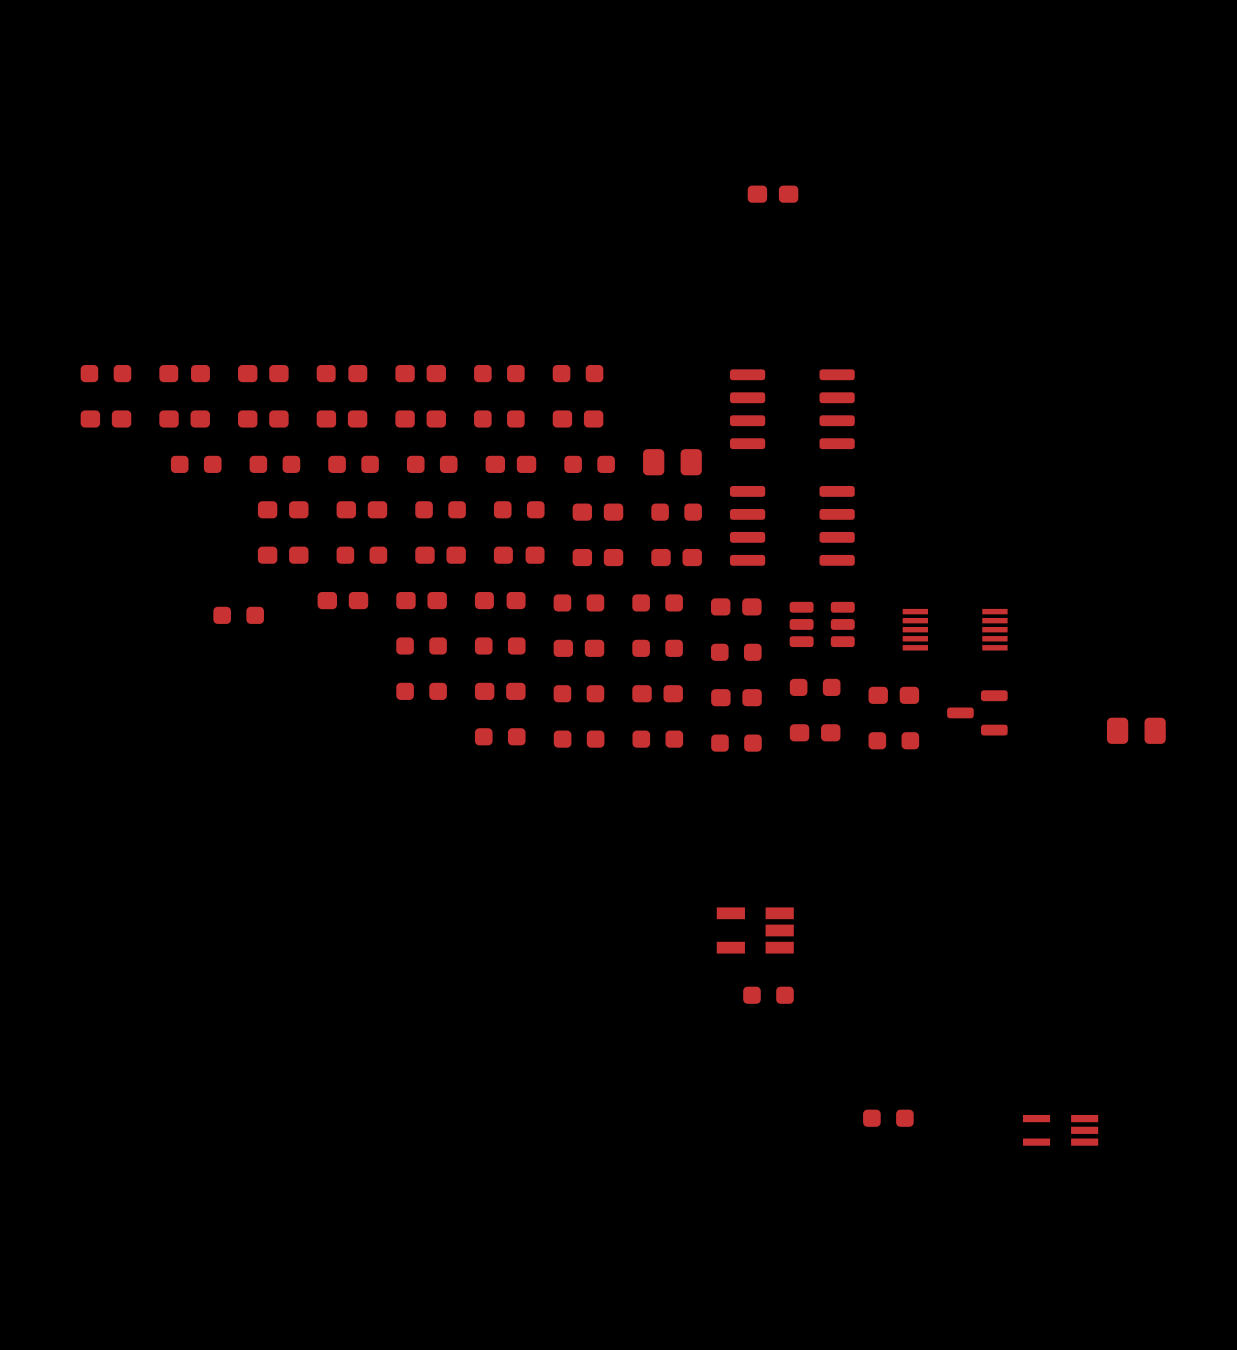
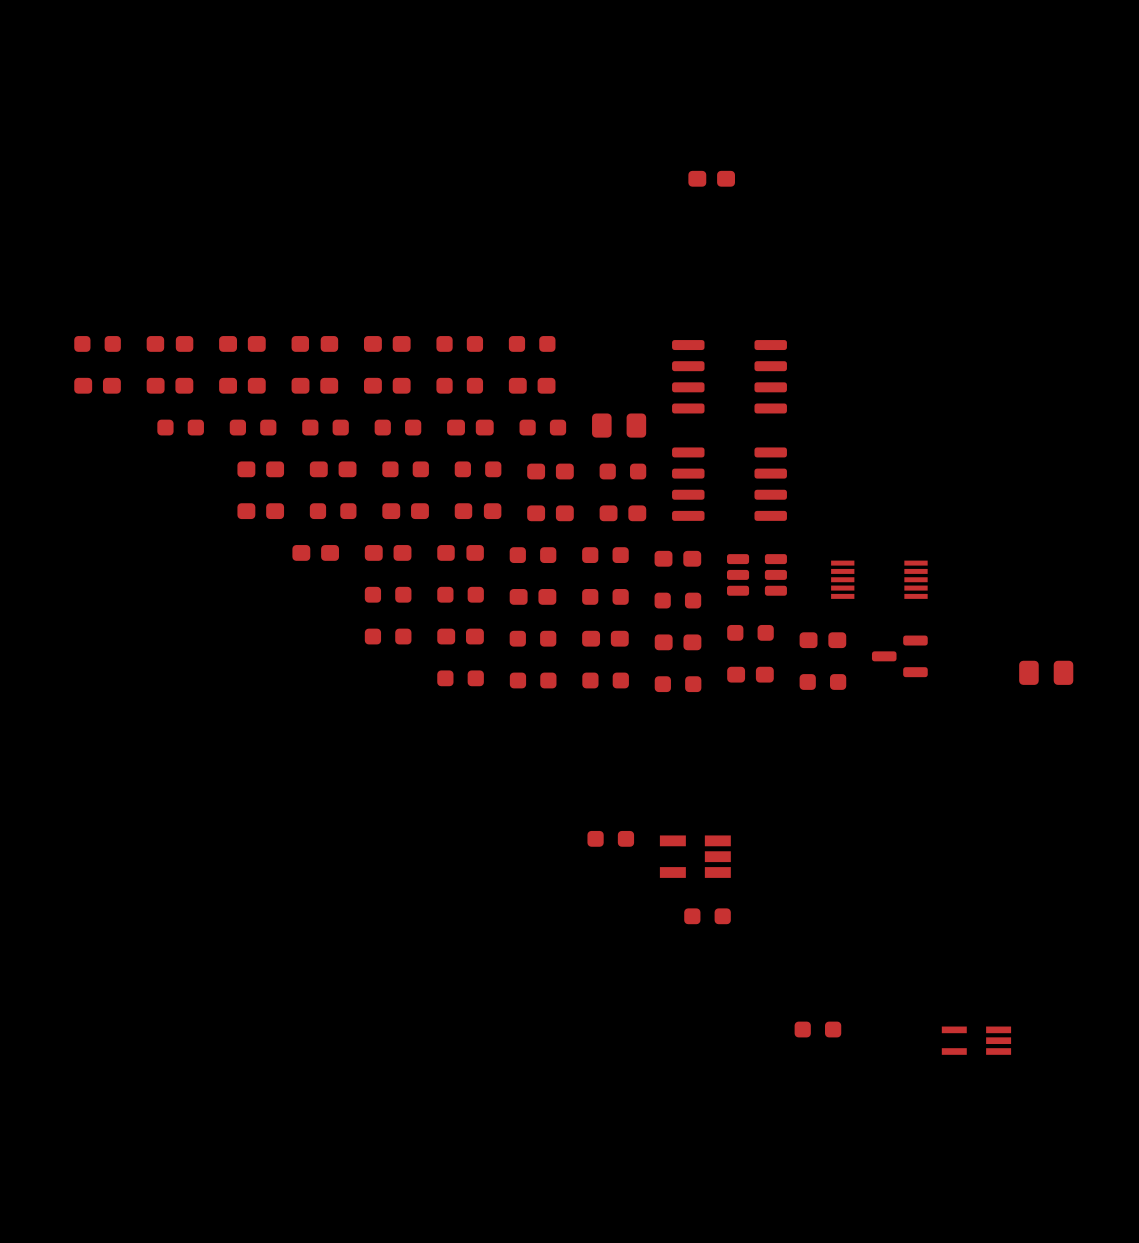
part: (238, 615) -> none
part: none -> (610, 838)

